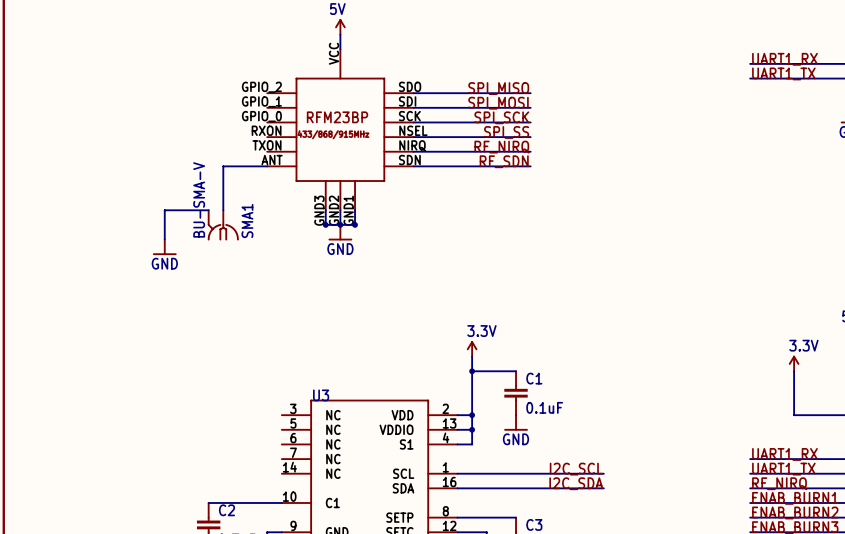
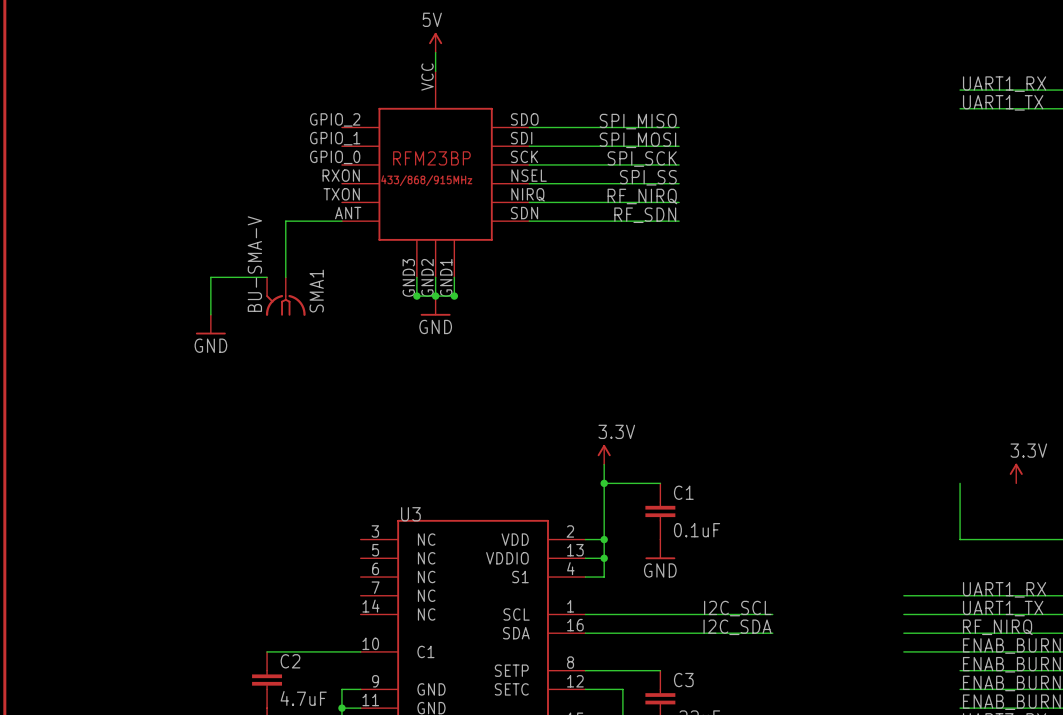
wire: (794, 371) (794, 415) -> (960, 483) (960, 539) (1016, 539)
wire: none -> (903, 595) (960, 595)
wire: none -> (903, 614) (960, 614)
wire: none -> (903, 633) (960, 633)
wire: none -> (903, 651) (960, 651)

